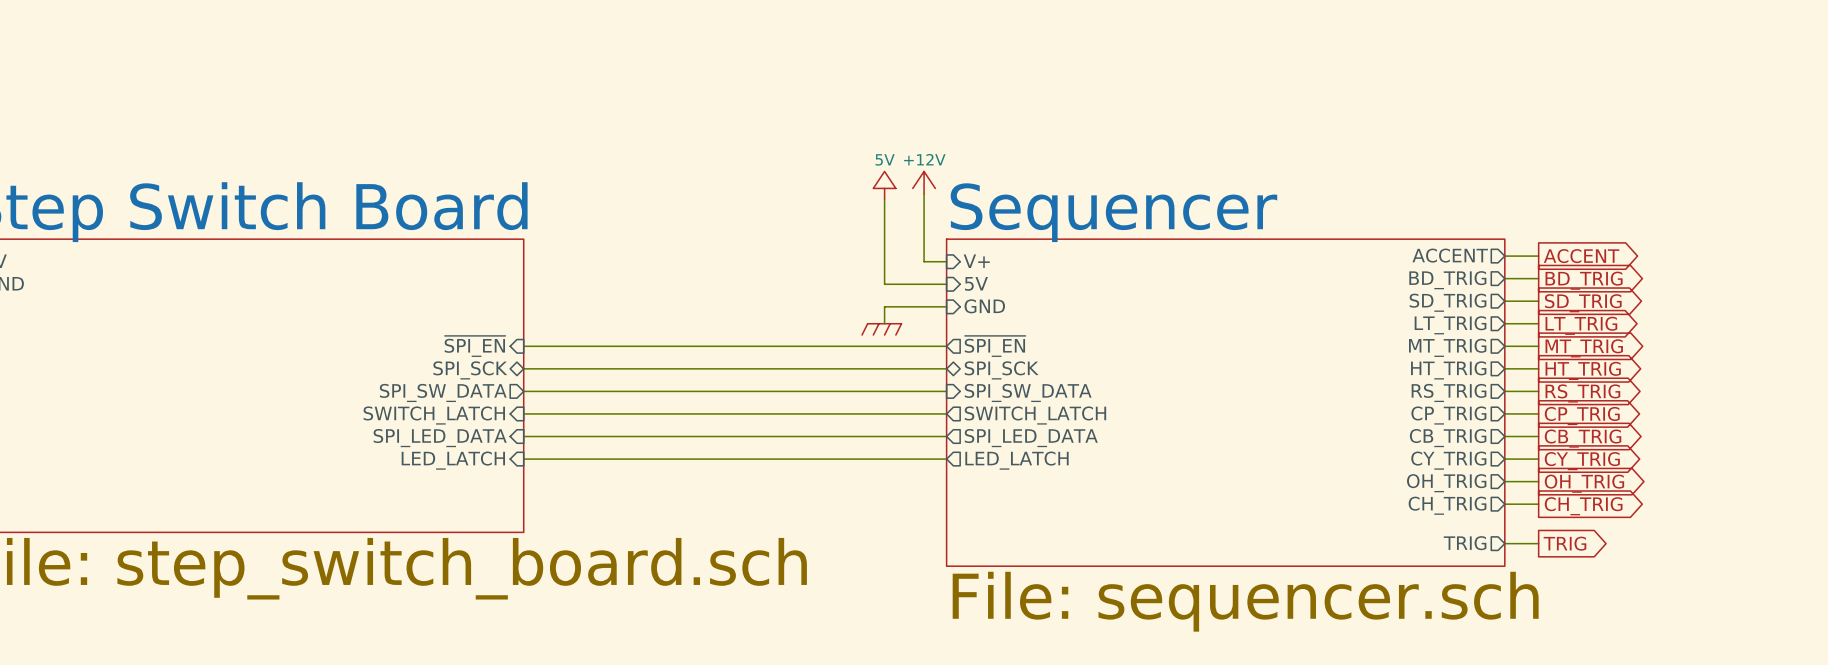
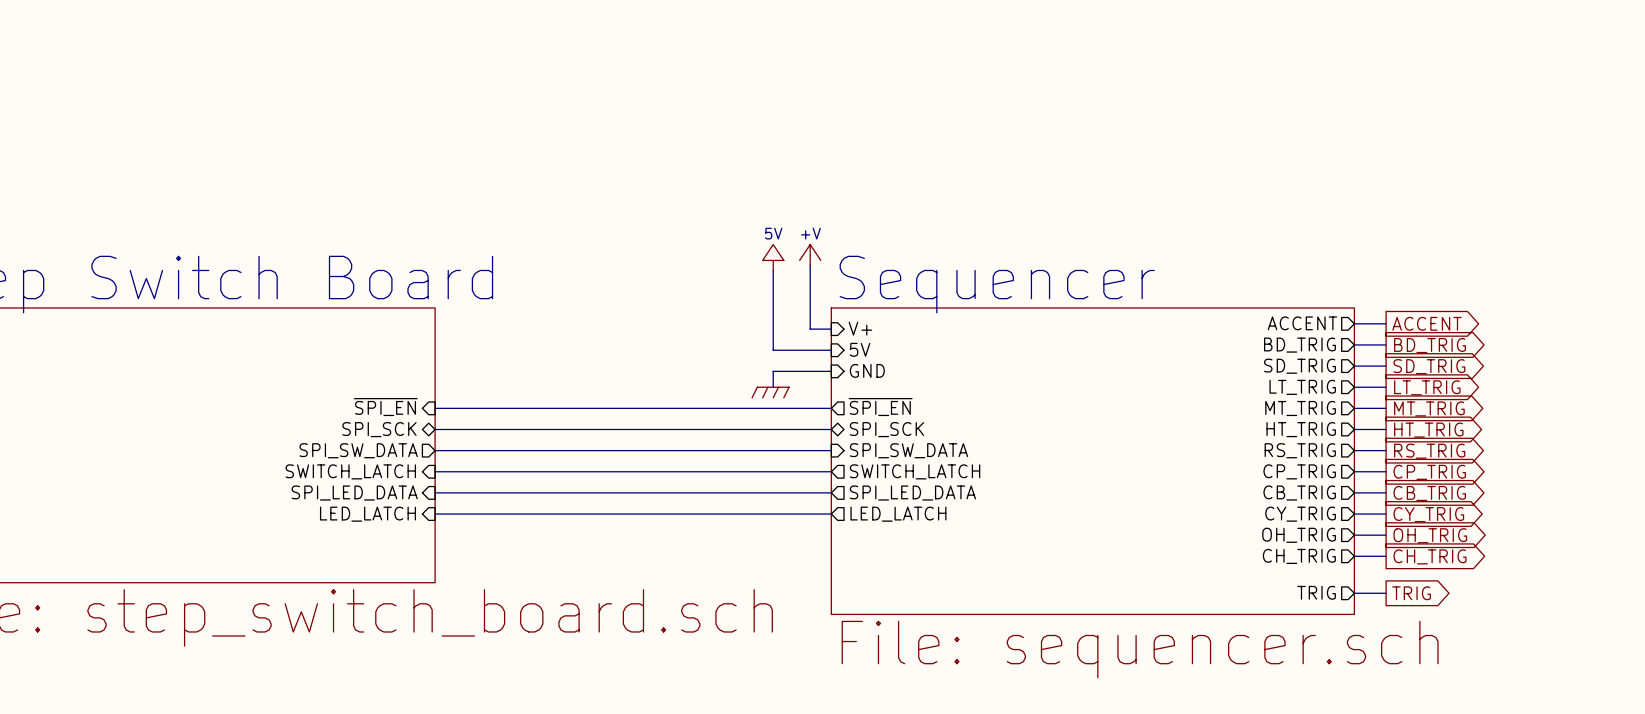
power symbol: +12V (924, 182) -> +V (810, 255)

